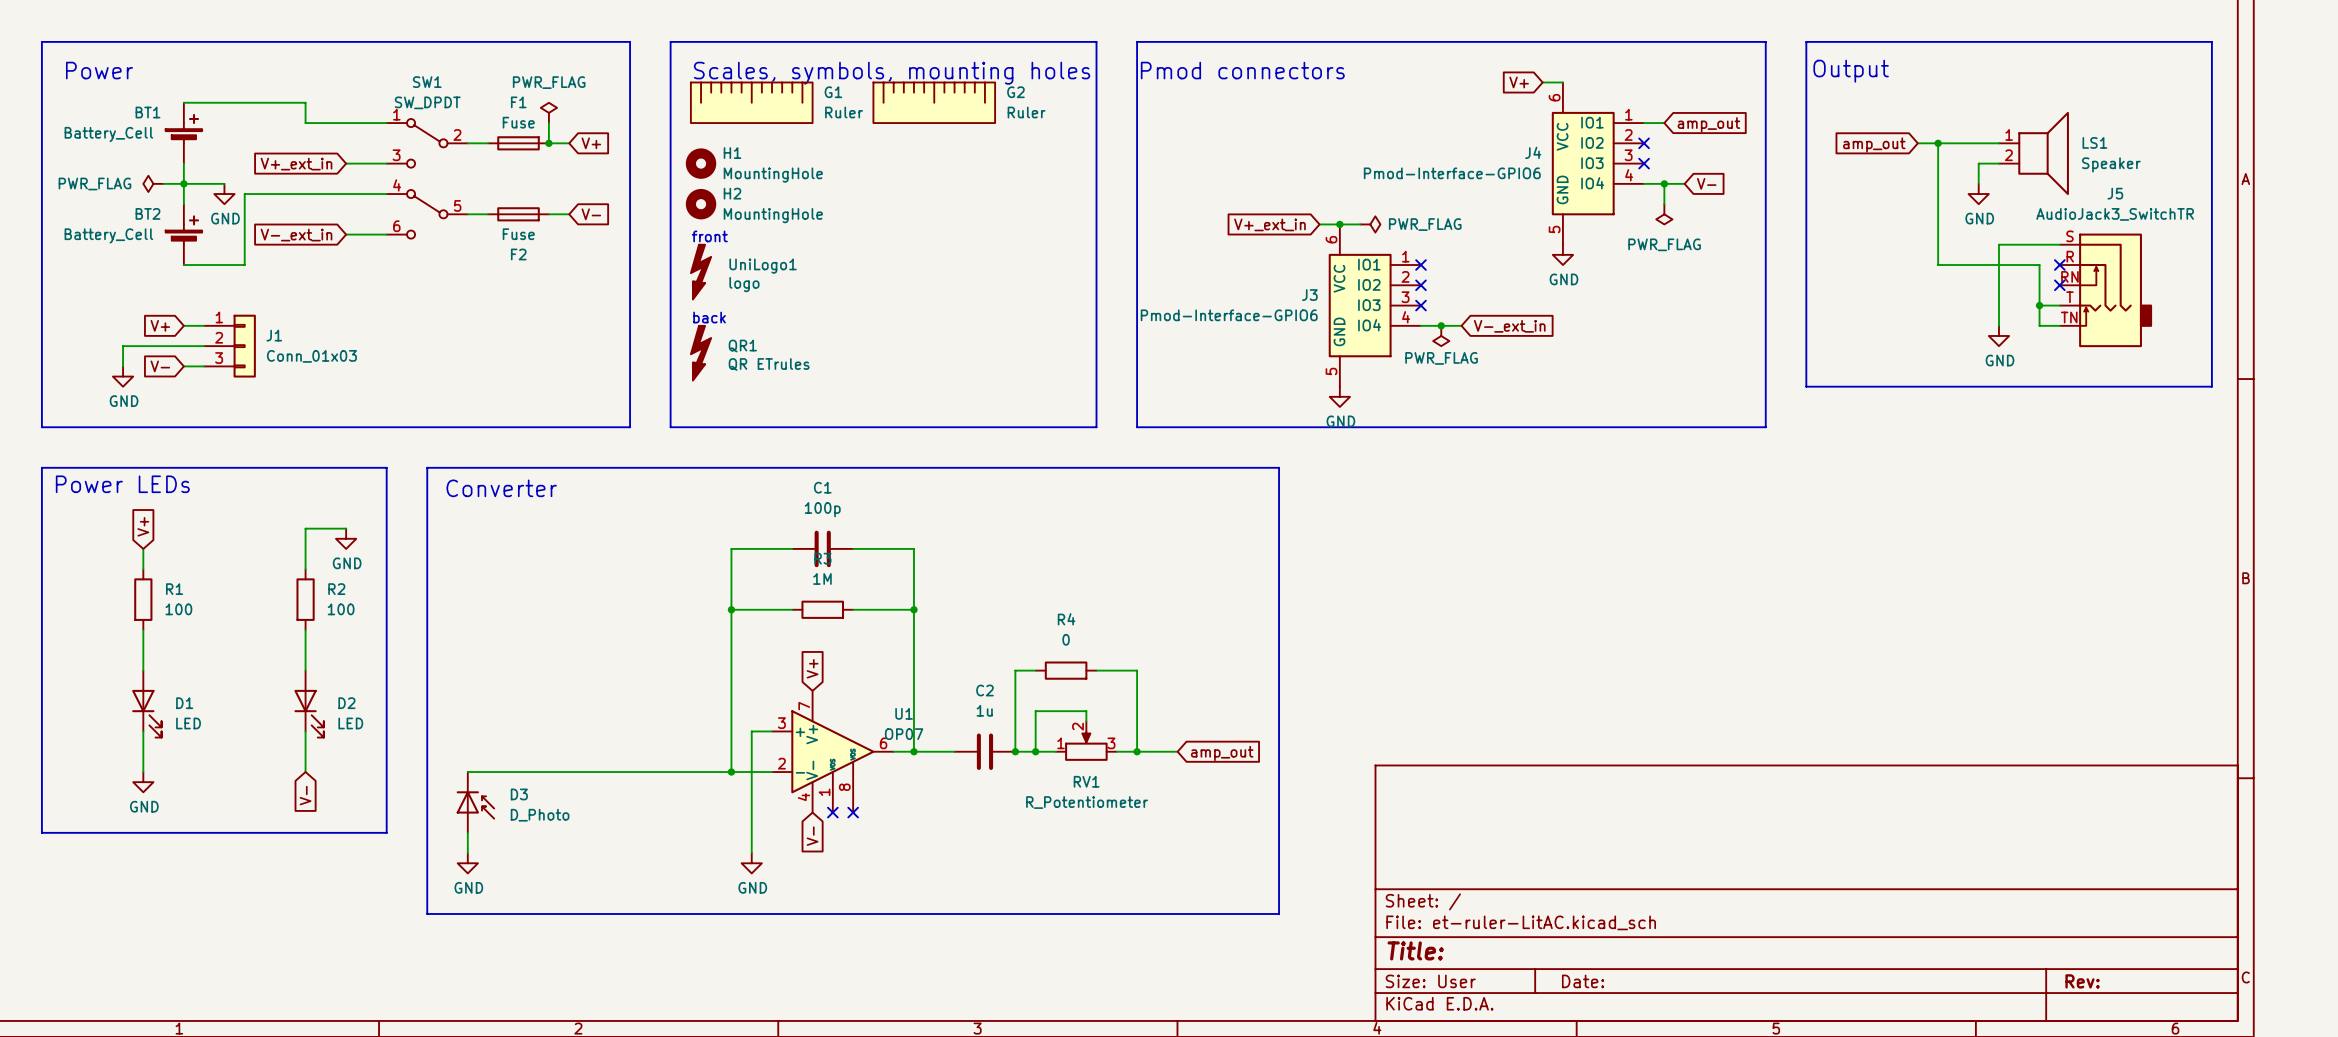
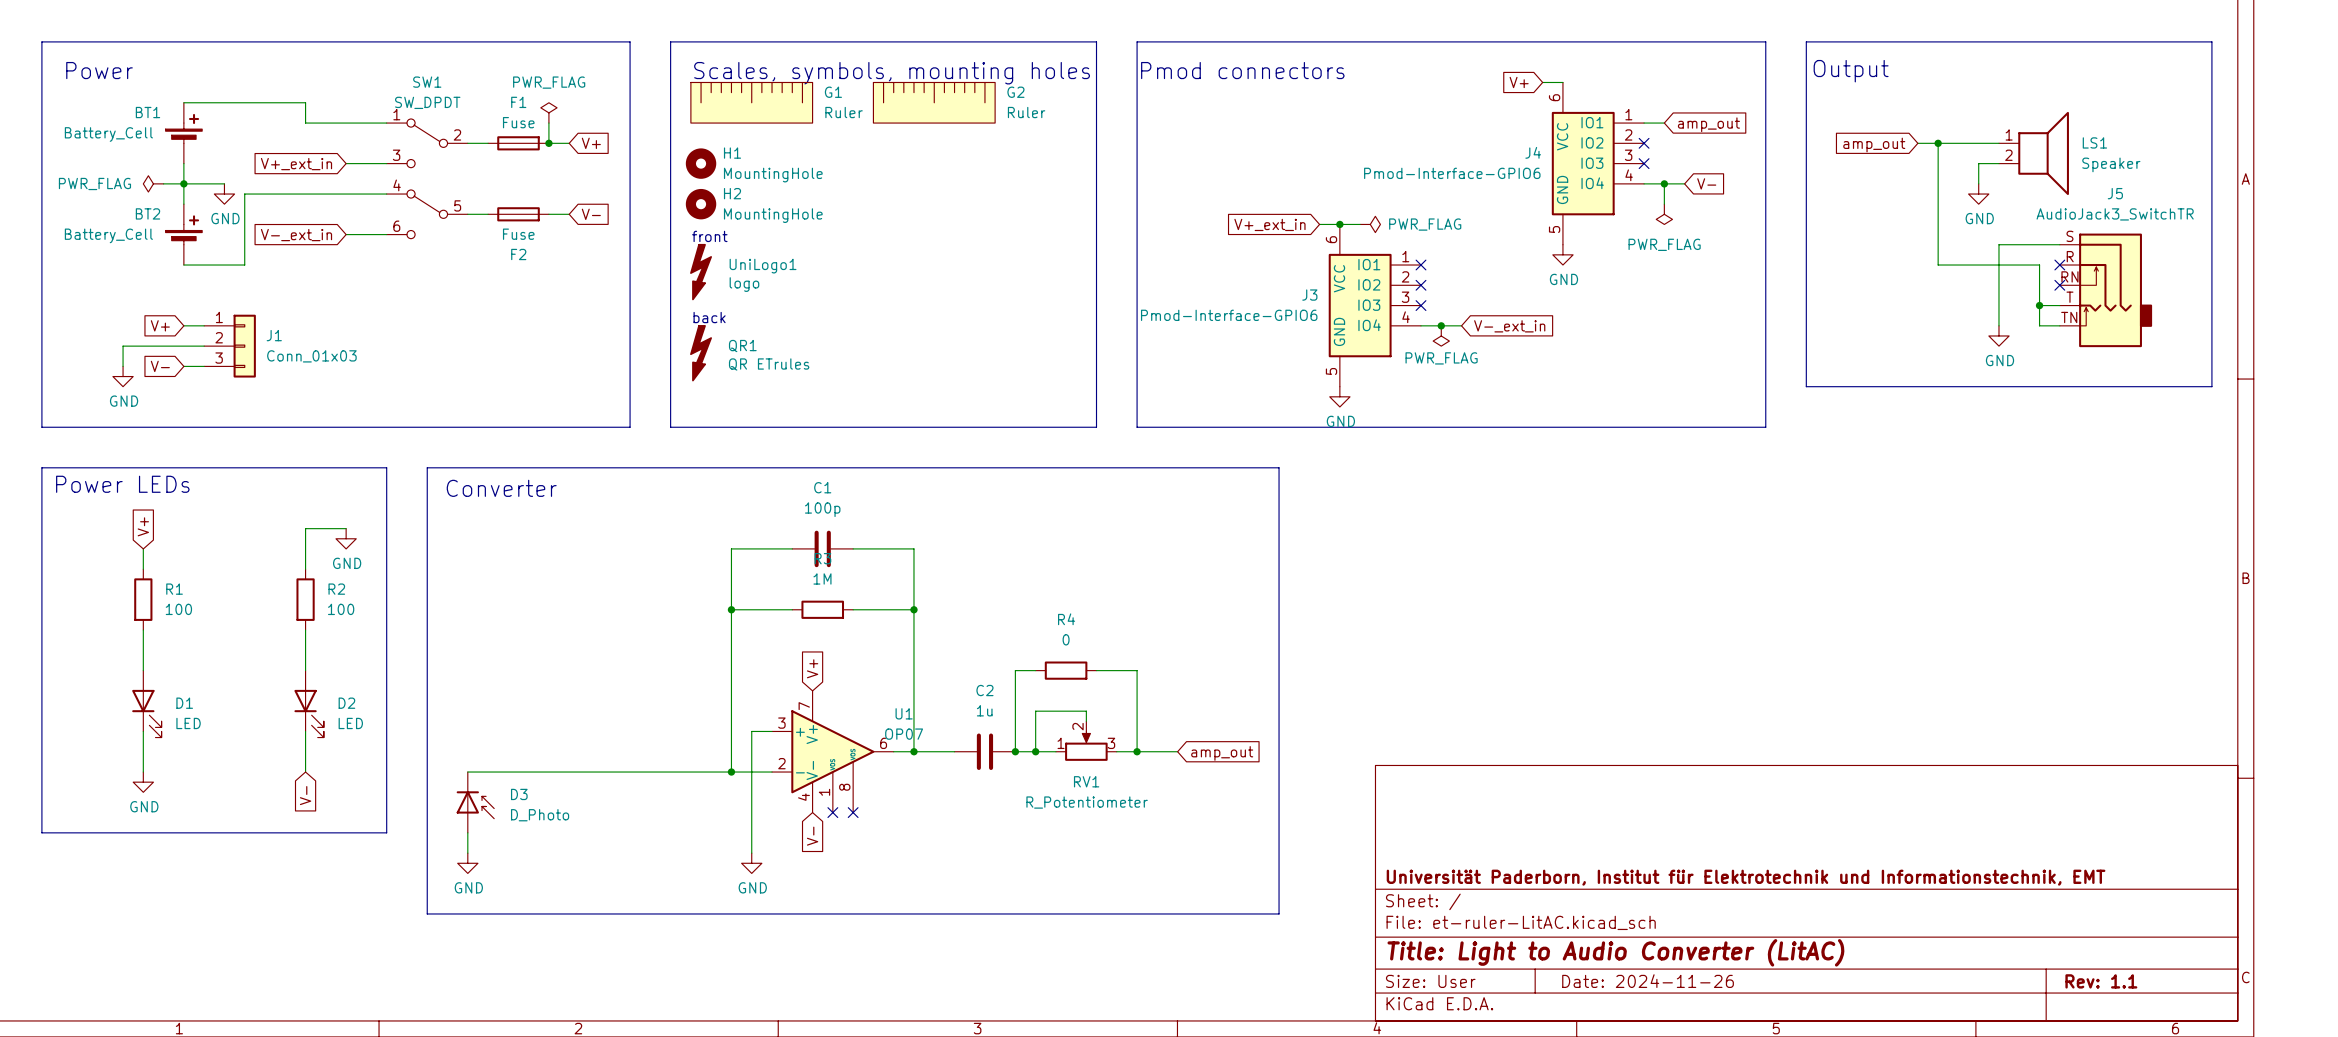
title block: none -> Universität Paderborn, Institut für Elektrotechnik und Informationstechnik, EMT (1746, 877)
title block: Title: (1415, 950) -> Title: Light to Audio Converter (LitAC) (1615, 952)
title block: Date: (1583, 981) -> Date: 2024-11-26 (1648, 981)
title block: Rev: (2082, 981) -> Rev: 1.1 (2101, 981)

